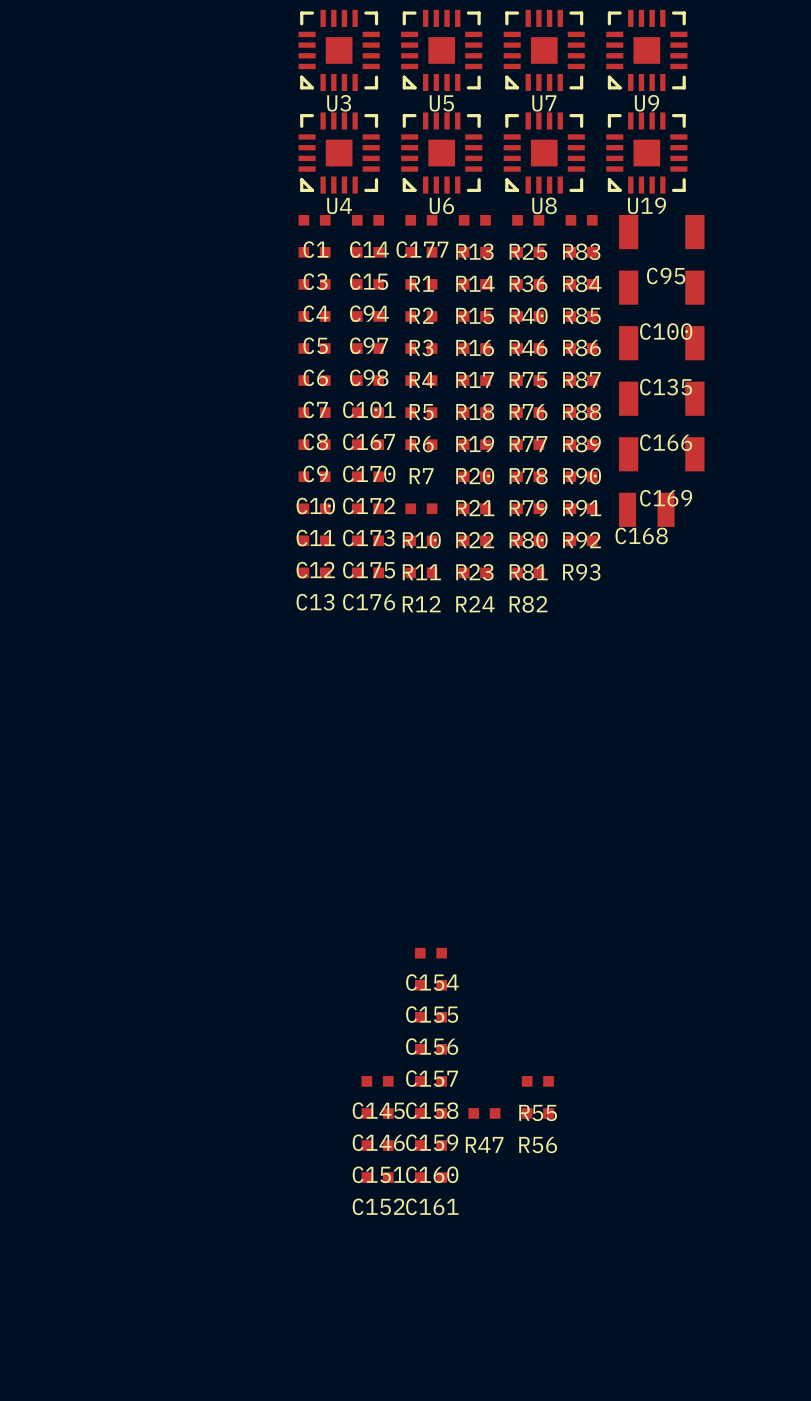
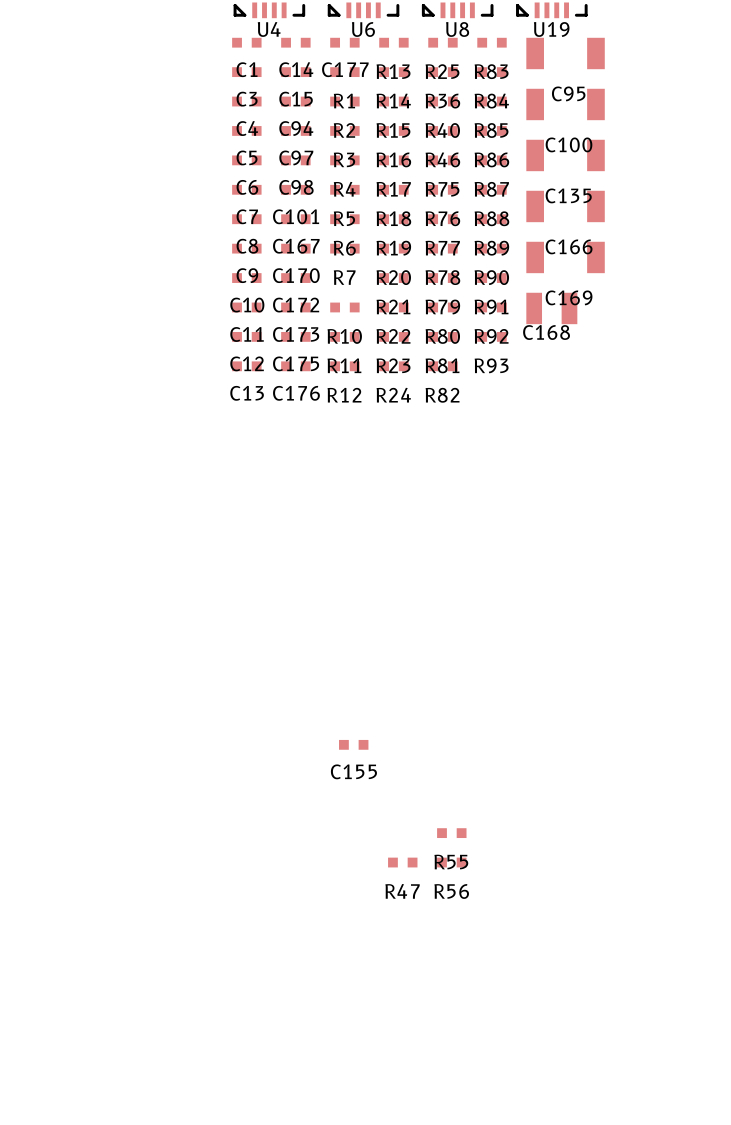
C154: (431, 953) -> none
C156: (431, 1017) -> none
C157: (431, 1049) -> none
C145: (377, 1081) -> none
C158: (431, 1081) -> none
C146: (377, 1113) -> none
C159: (431, 1113) -> none
C151: (377, 1145) -> none
C160: (431, 1145) -> none
C152: (377, 1177) -> none
C161: (431, 1177) -> none

